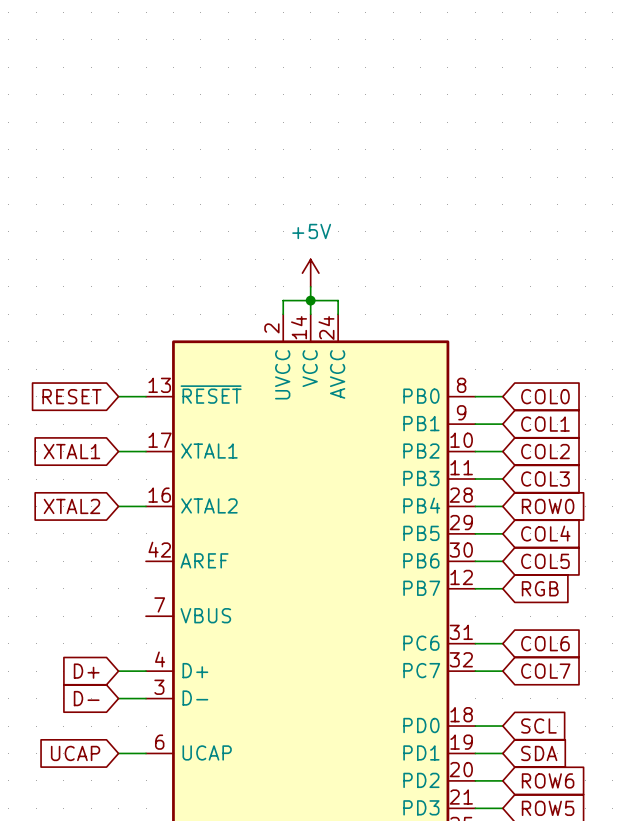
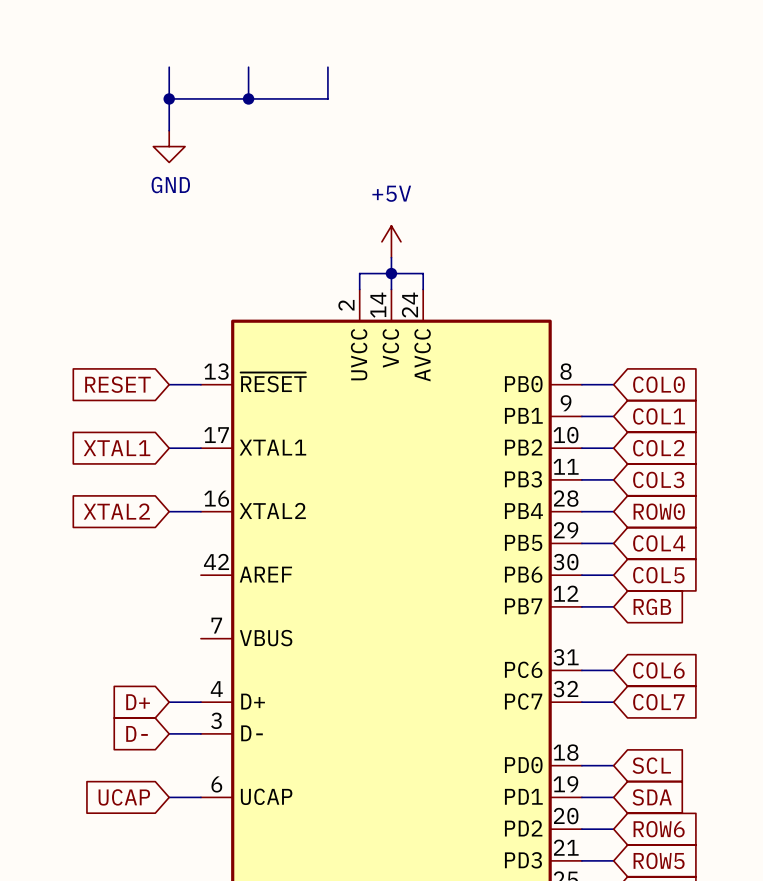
wire: none -> (169, 67) (169, 130)
wire: none -> (248, 67) (248, 98)
wire: none -> (327, 67) (327, 98) (169, 98)
junction: none -> (169, 98)
junction: none -> (248, 98)
power symbol: none -> GND (169, 146)

